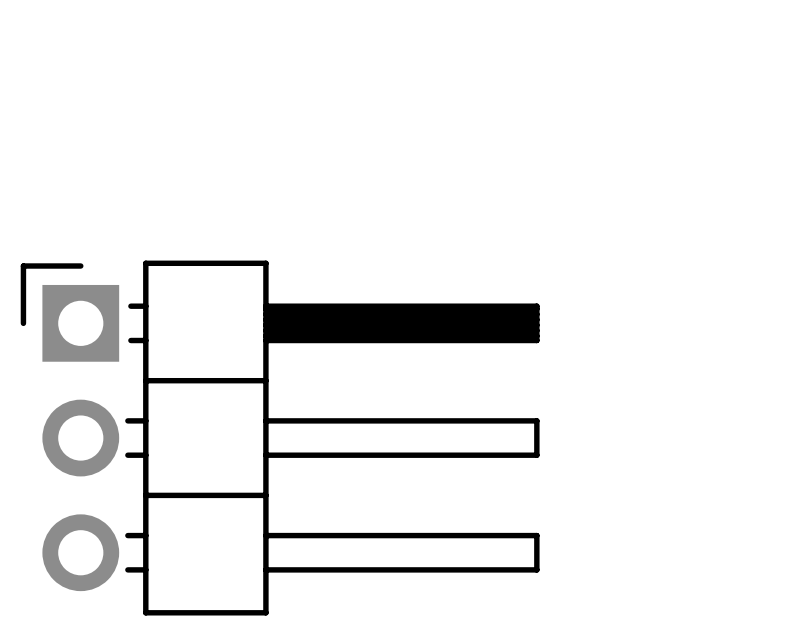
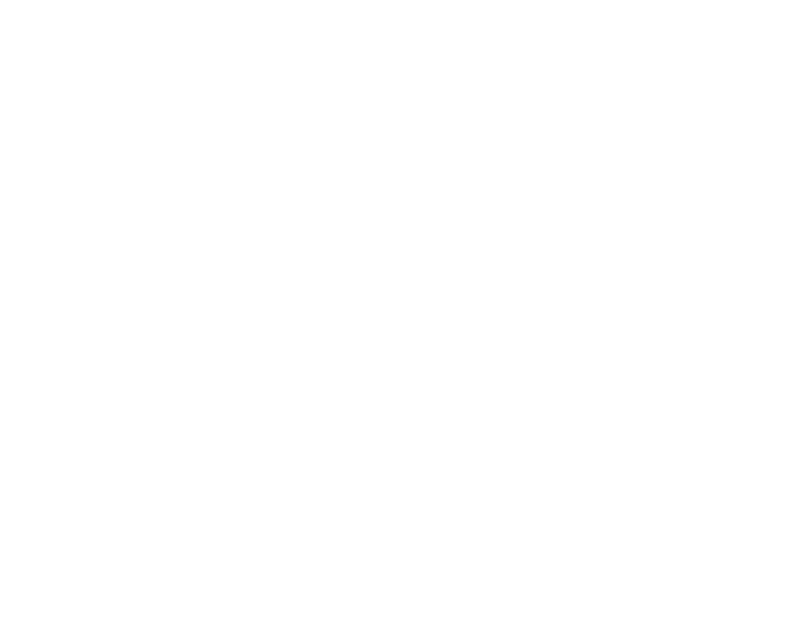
part: (280, 438) -> none

